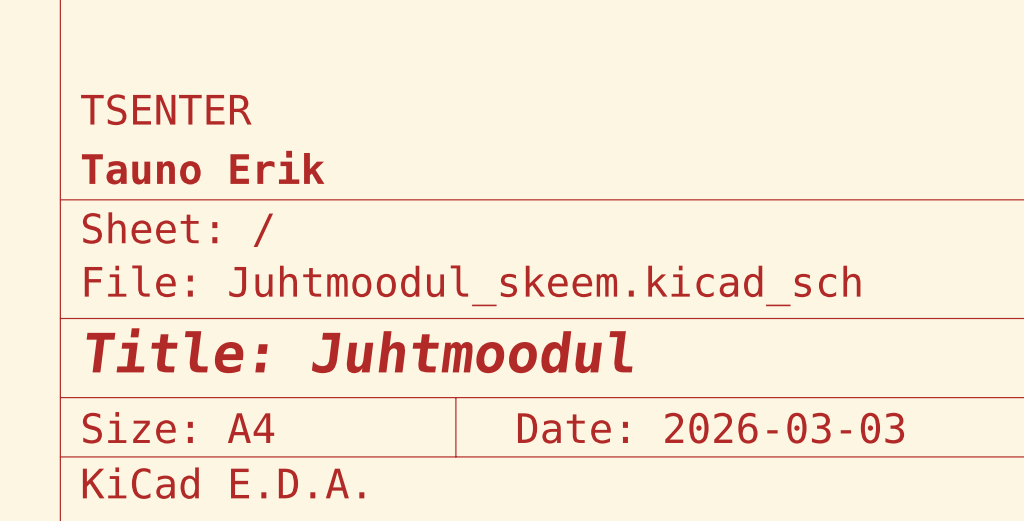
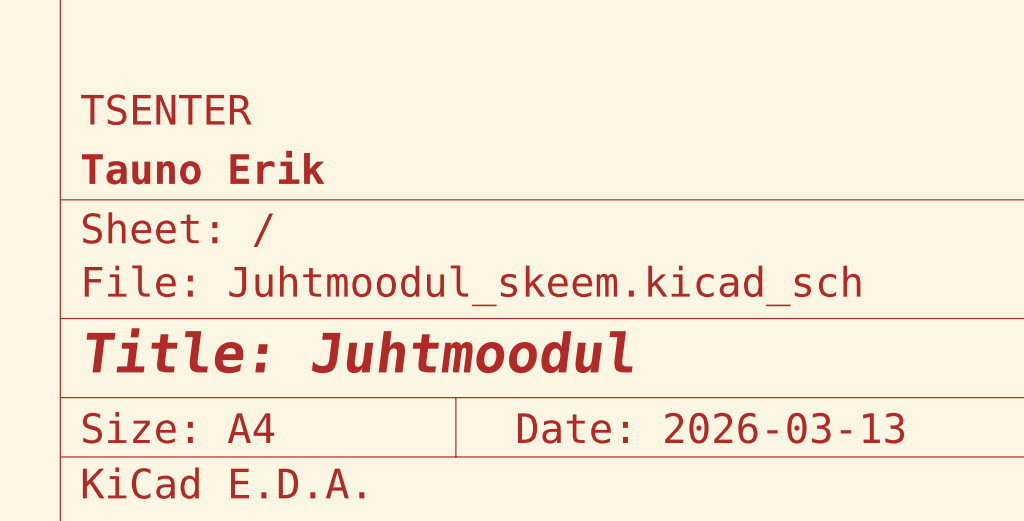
title block: Date: 2026-03-03 (711, 428) -> Date: 2026-03-13 (711, 428)

